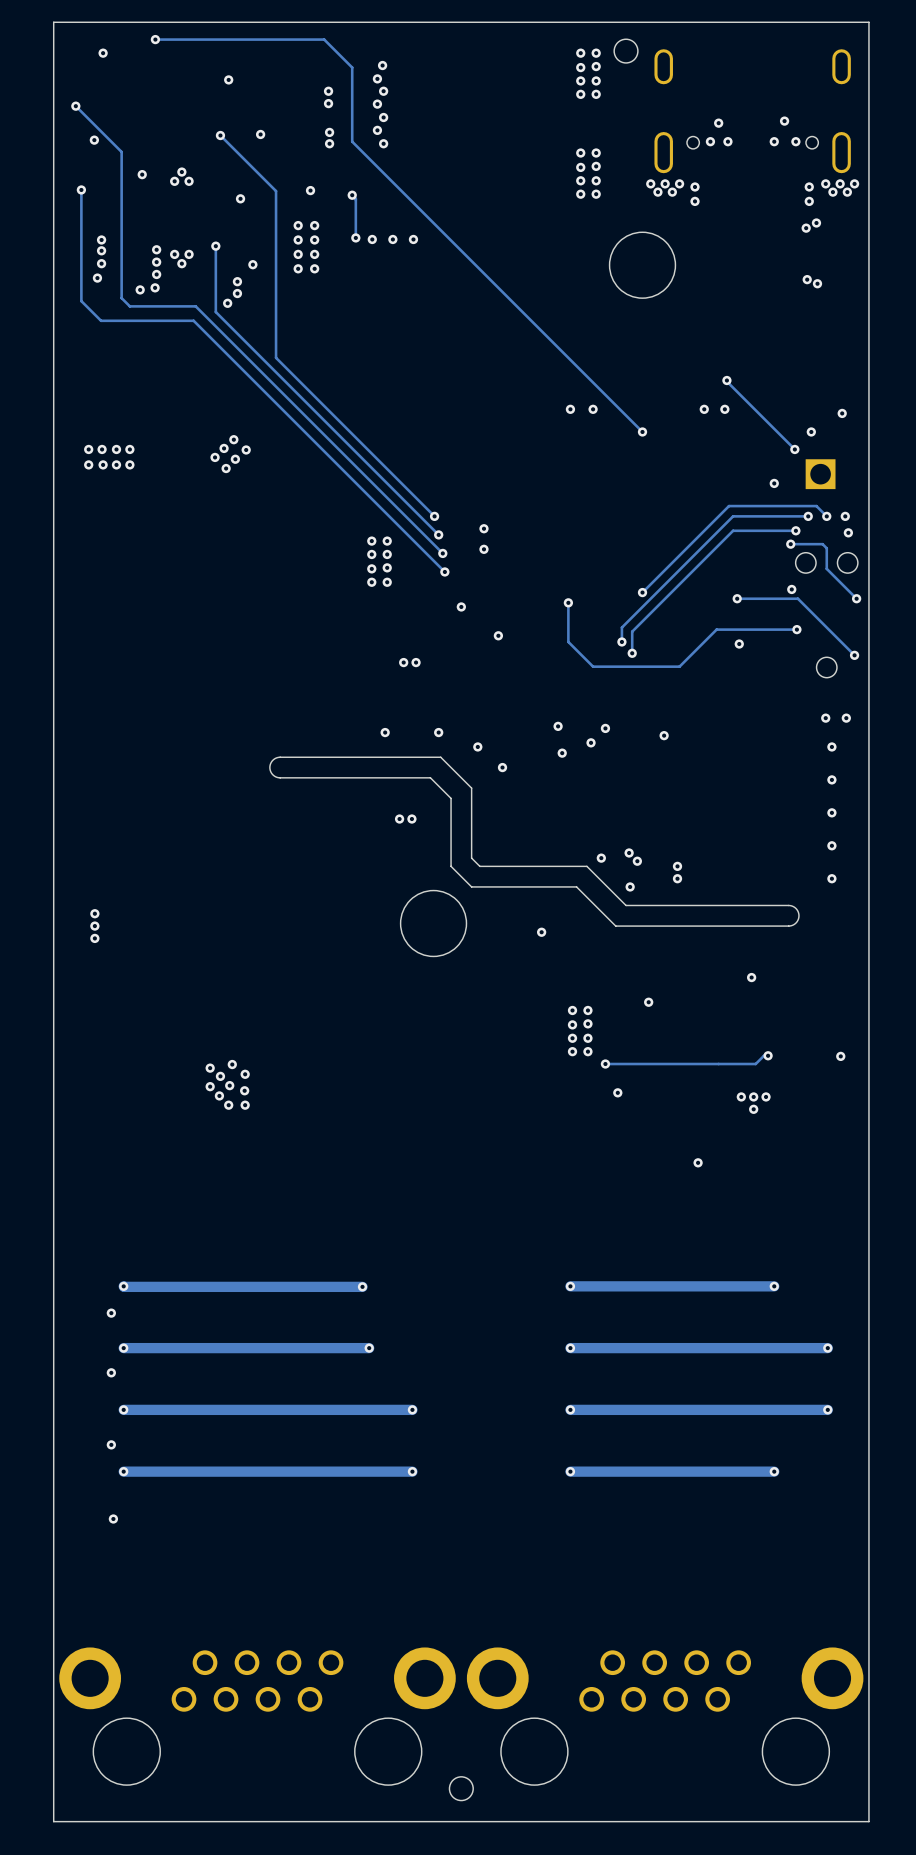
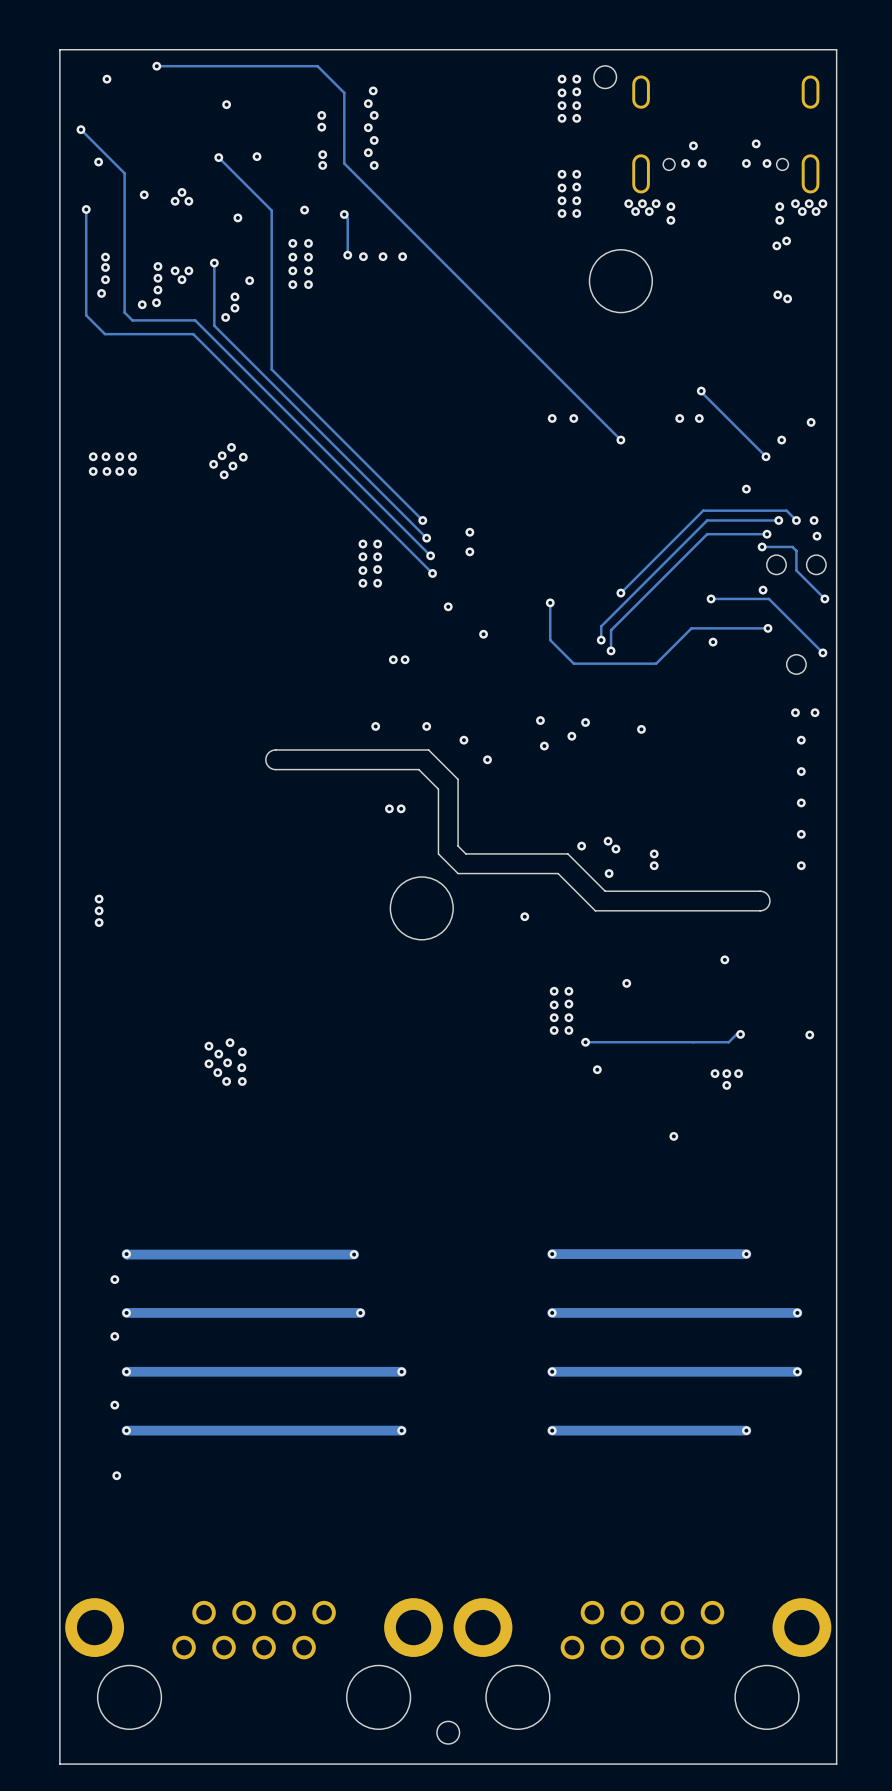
part: (820, 474) -> none

